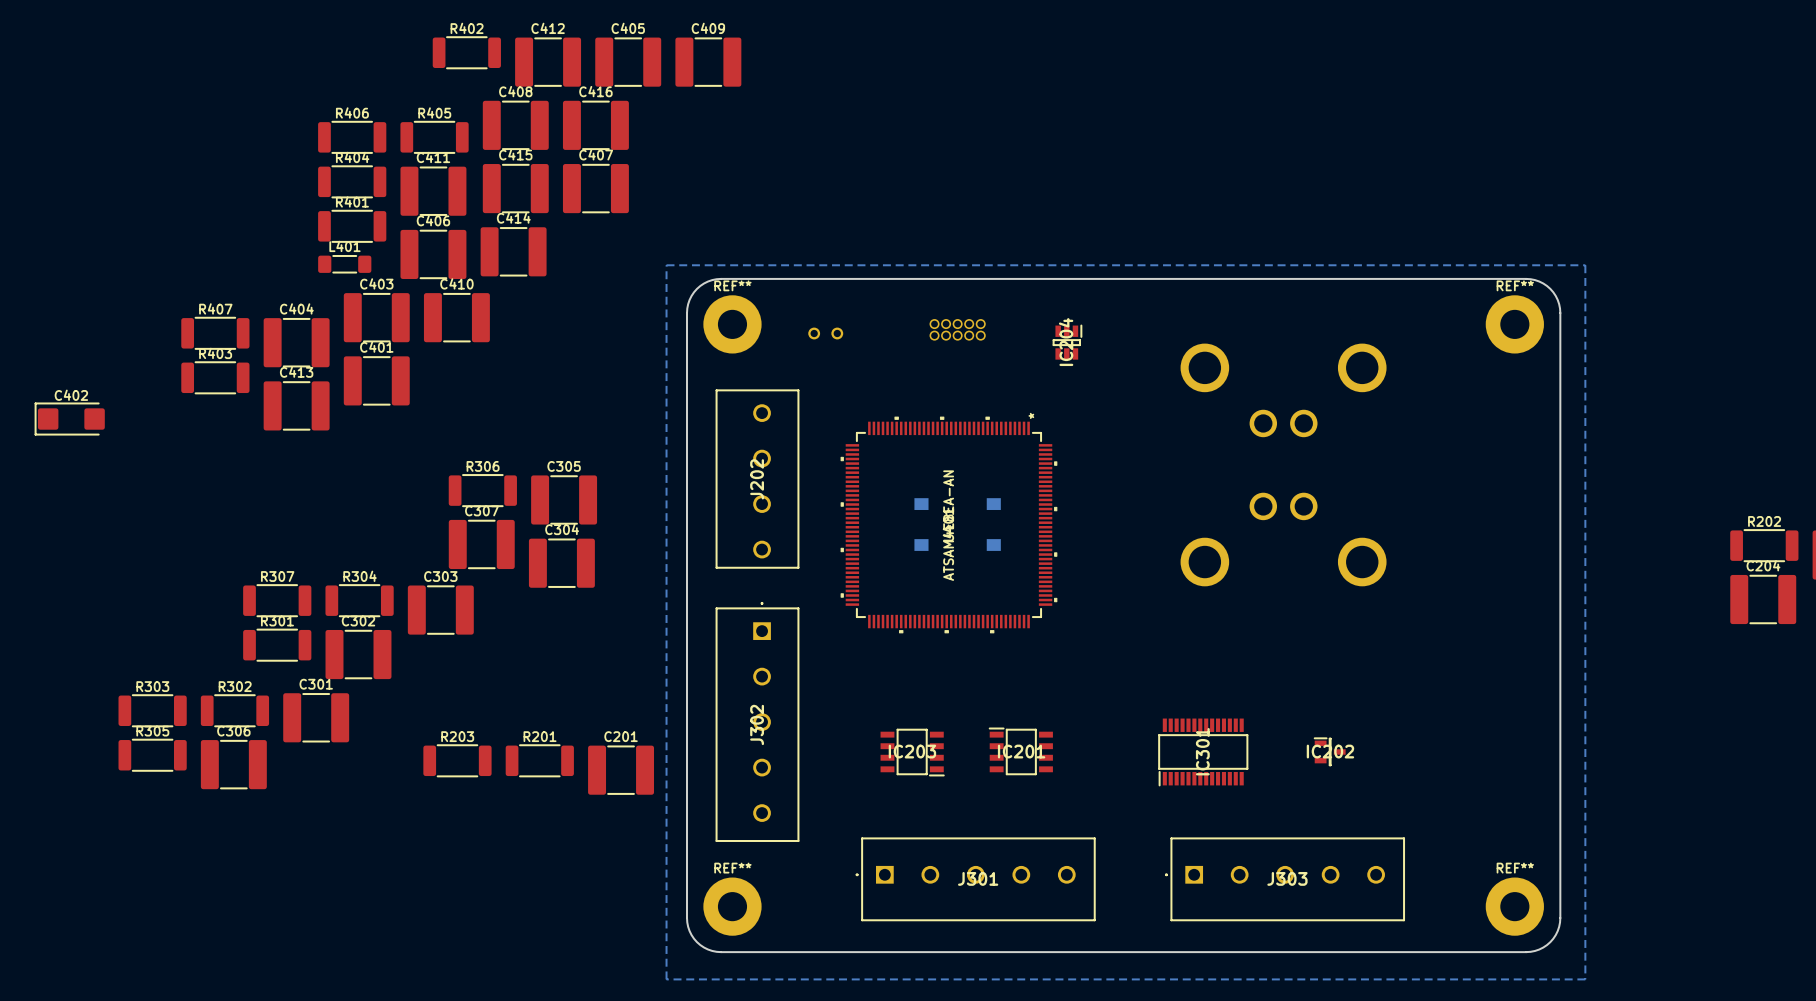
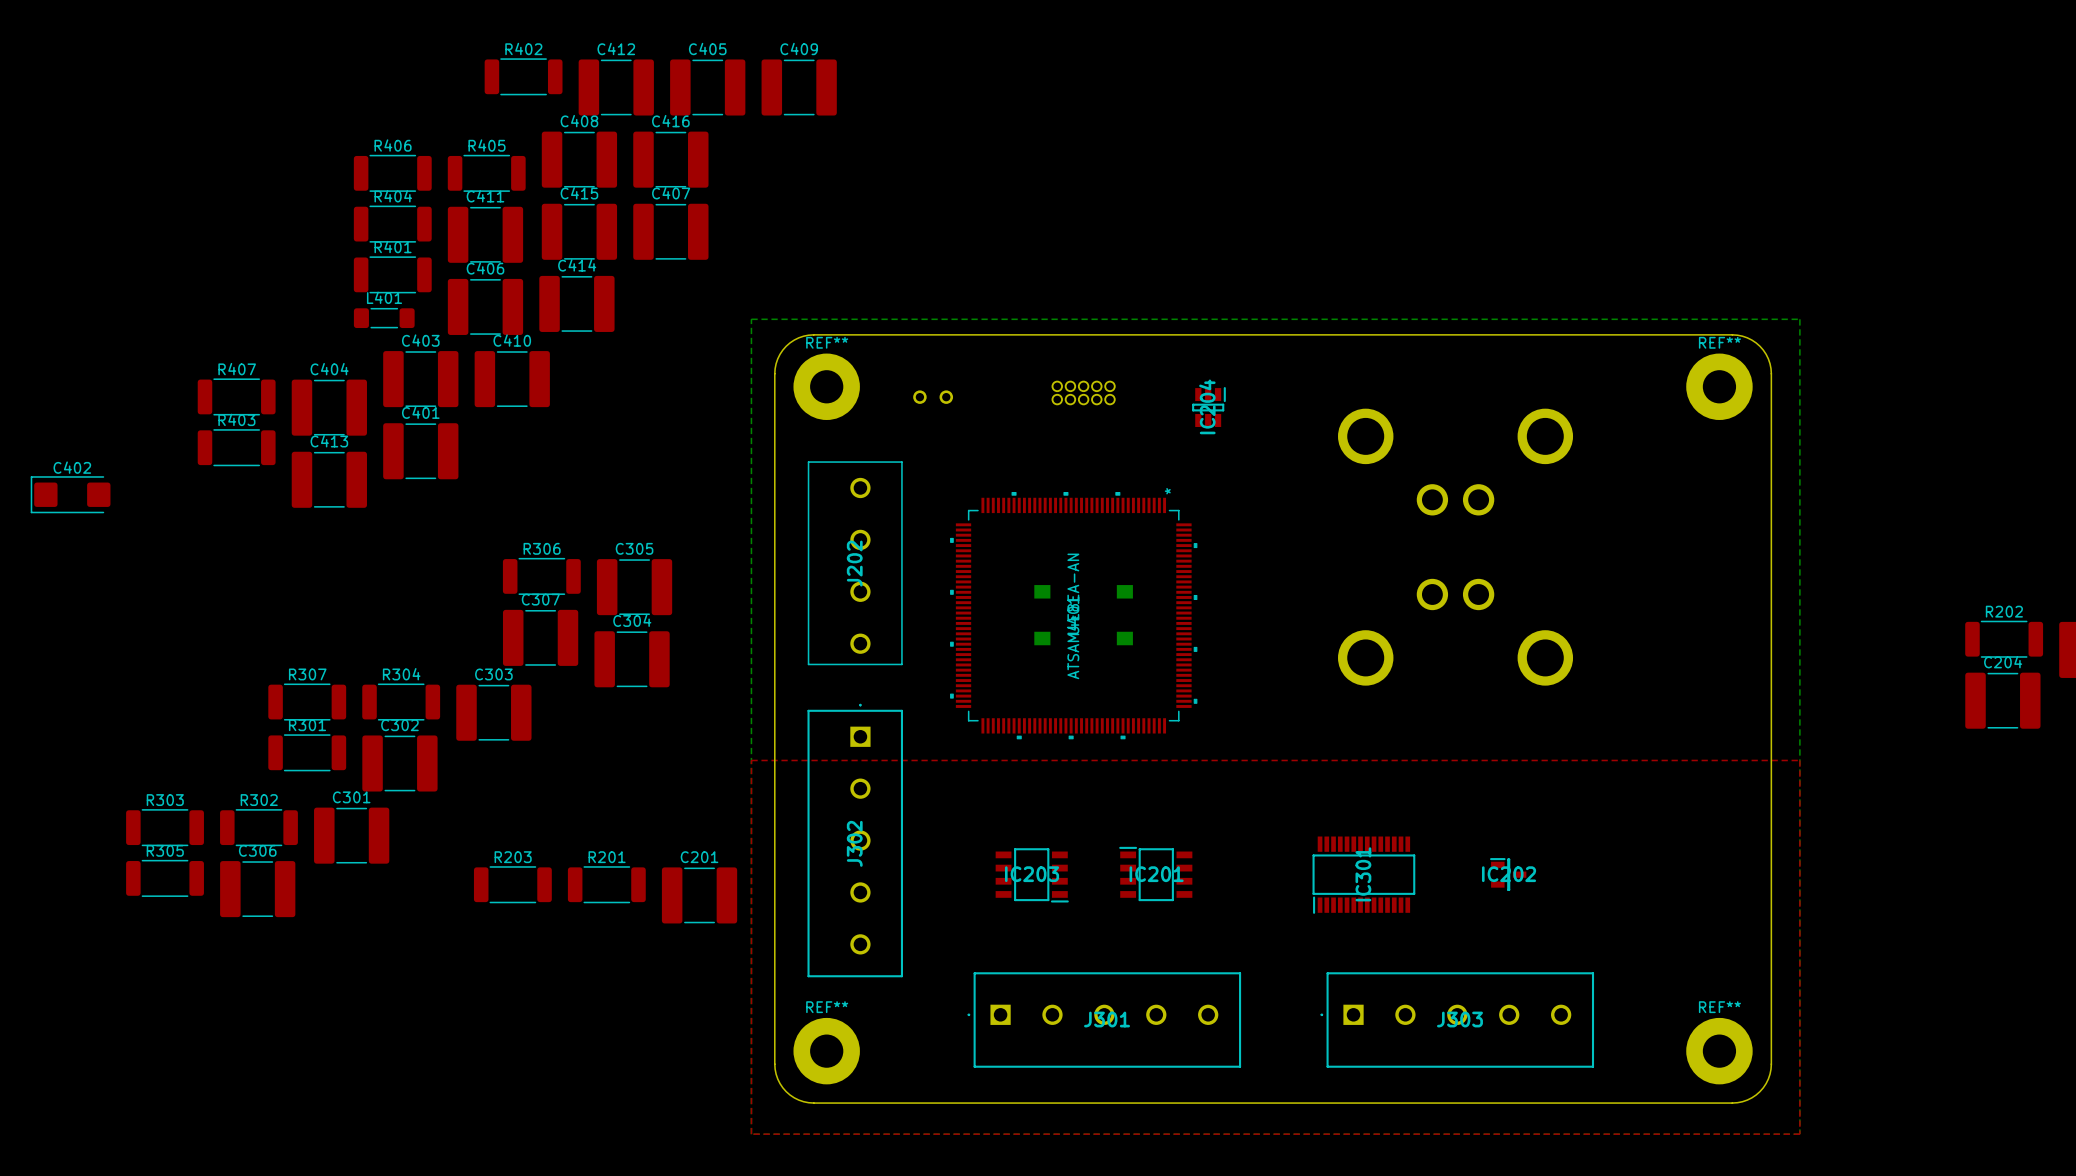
top zone outline: none -> (751, 760) (751, 1134) (1799, 1134) (1799, 760) (751, 760)

